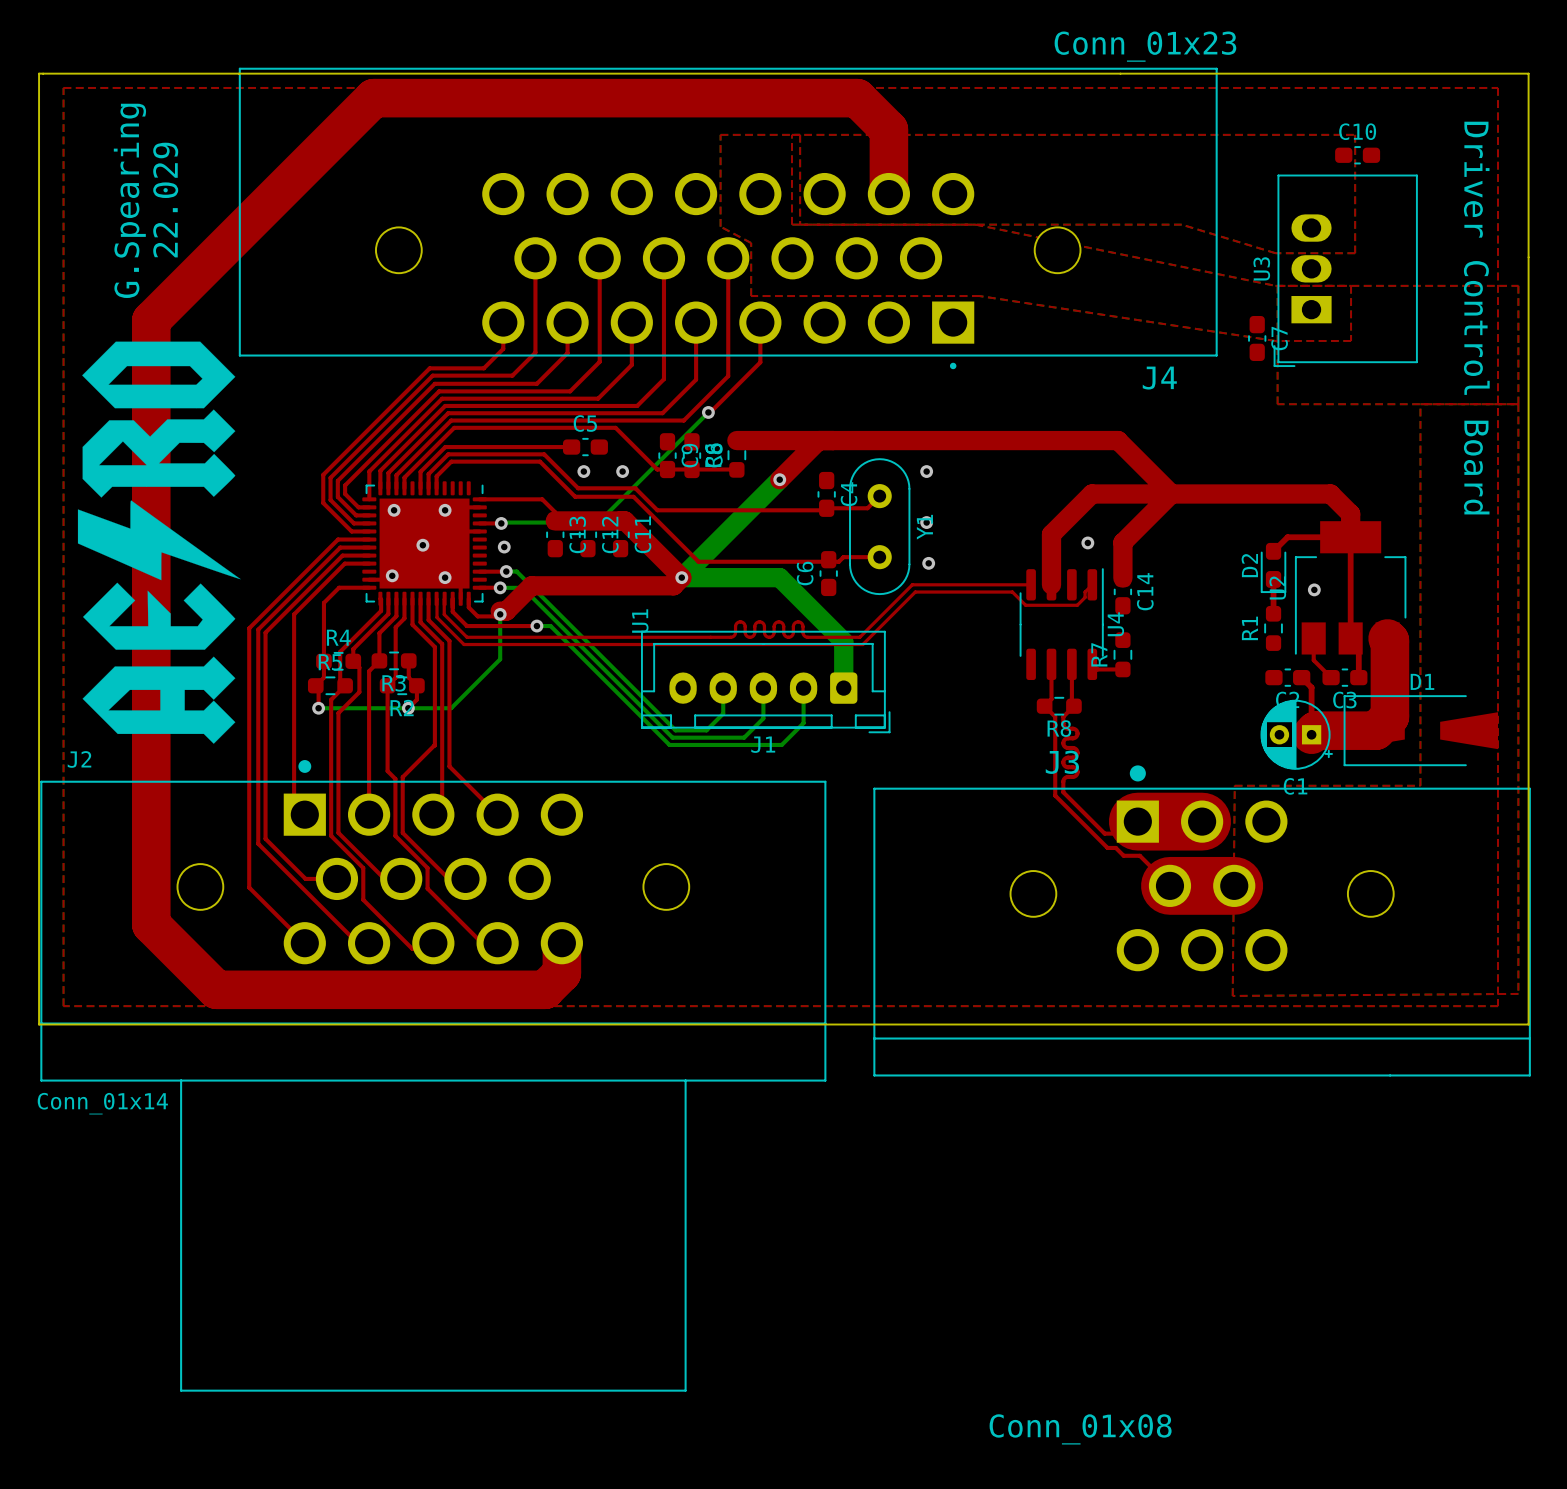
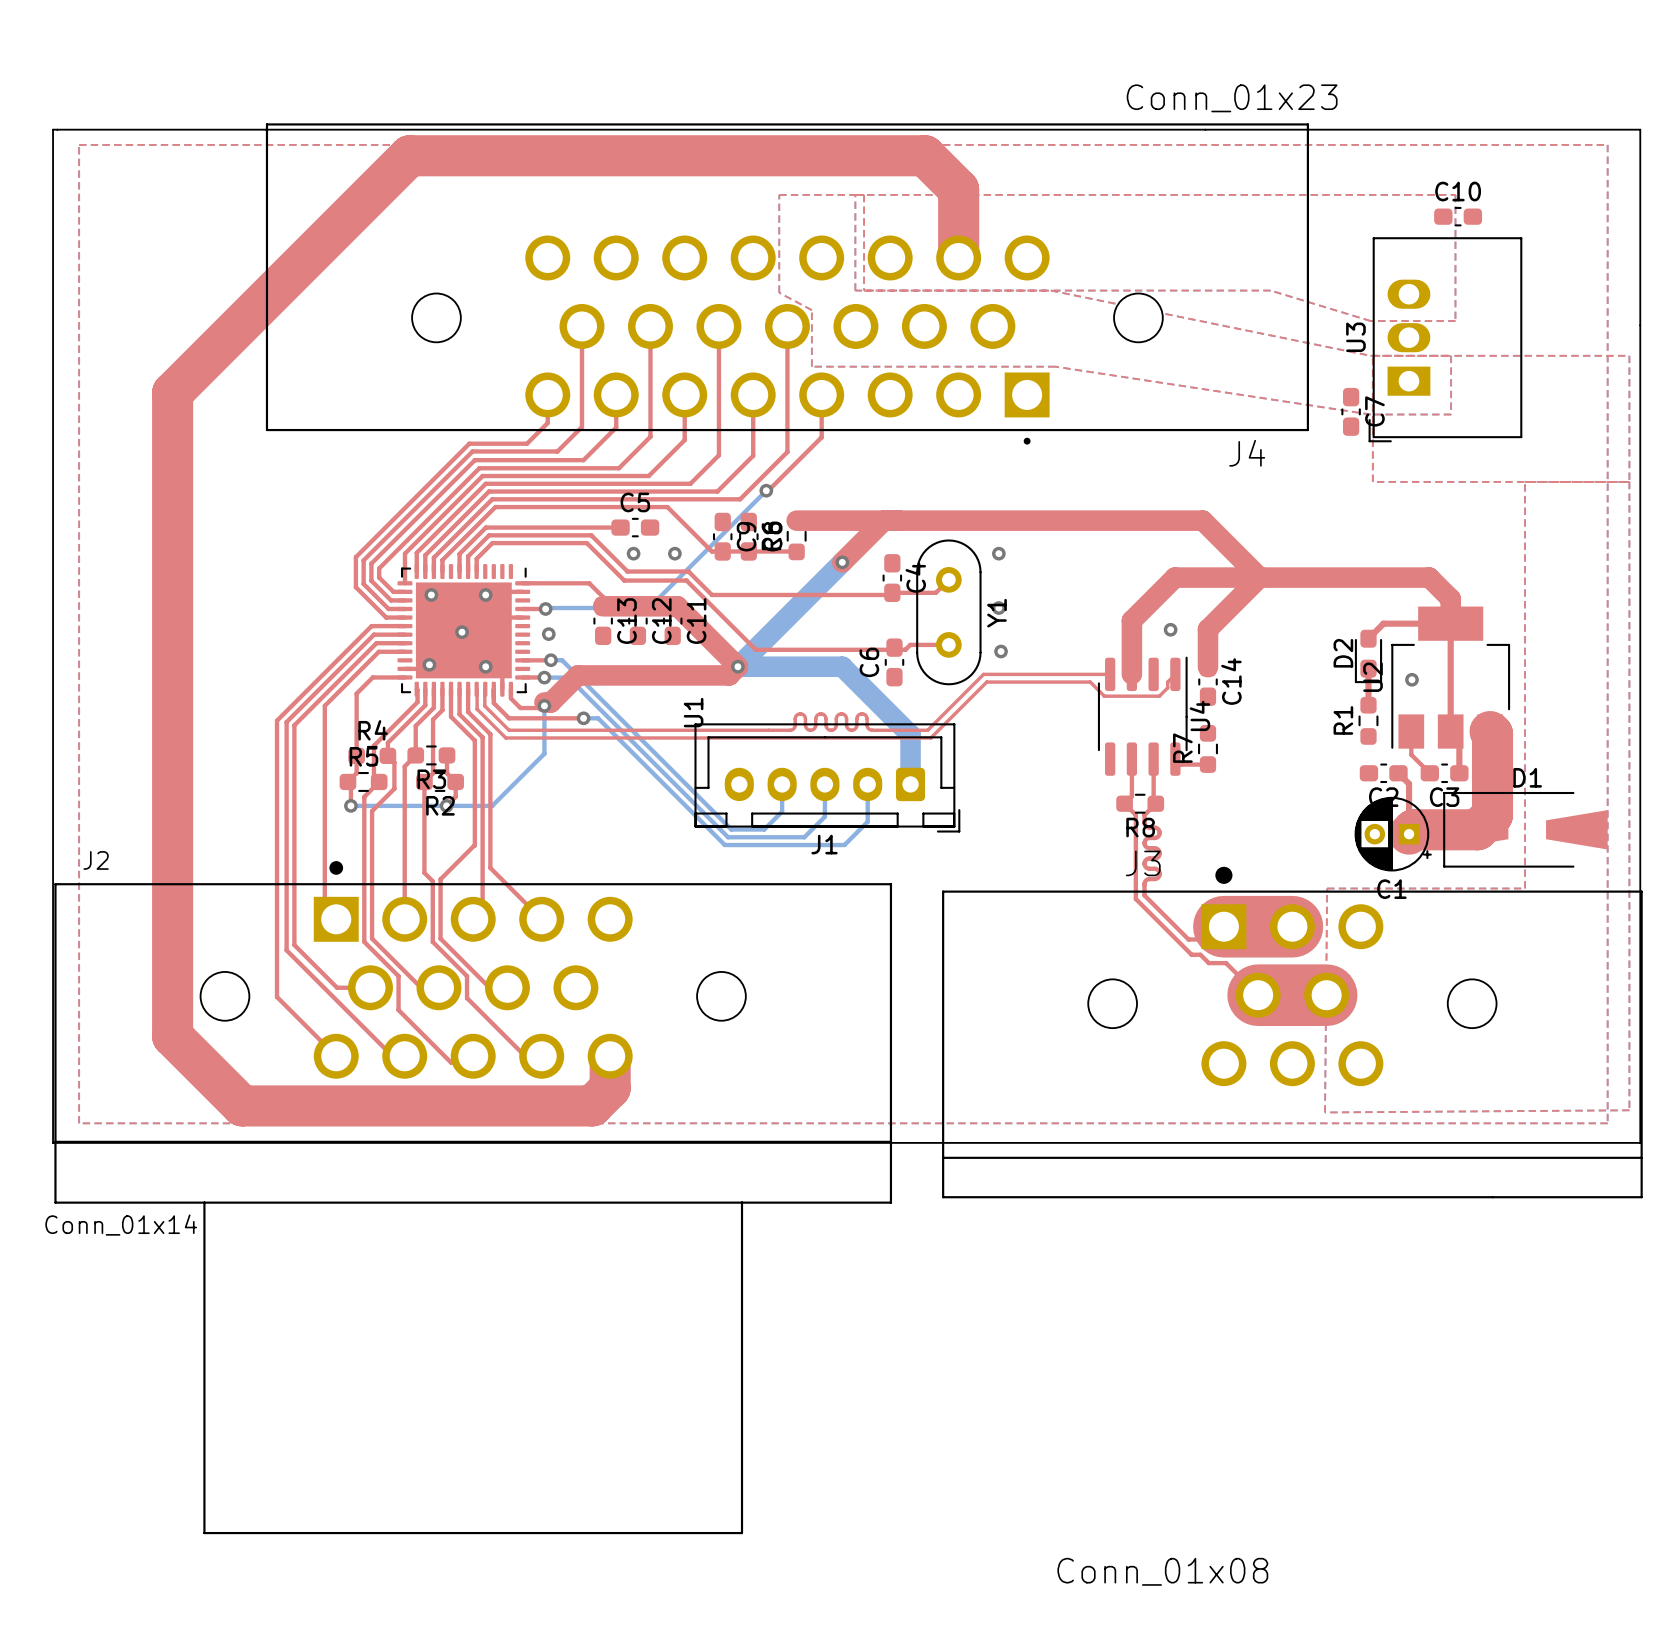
text: G.Spearing (129, 200) -> none
text: 22.029 (165, 200) -> none
text: Driver Control Board (1476, 318) -> none
drawing: [77, 341, 241, 744] -> none

